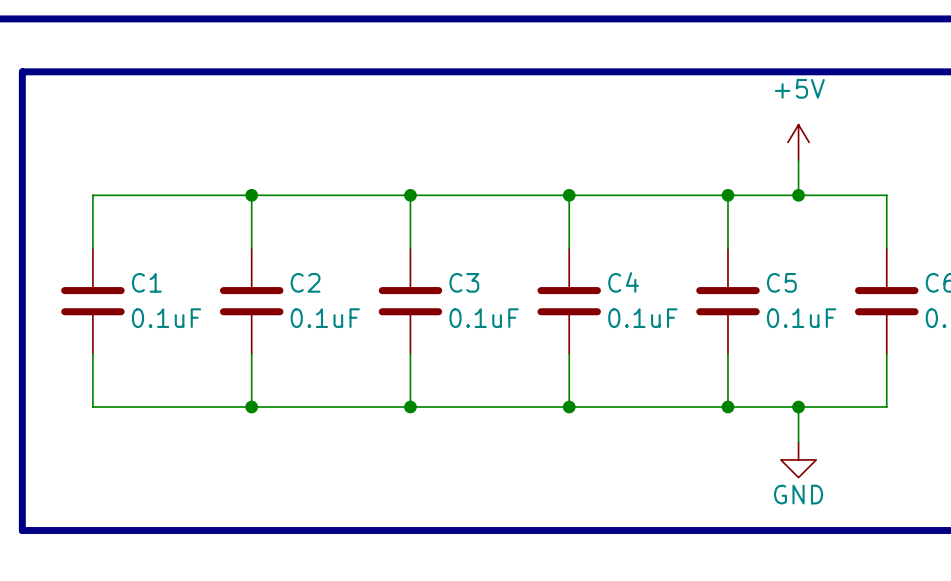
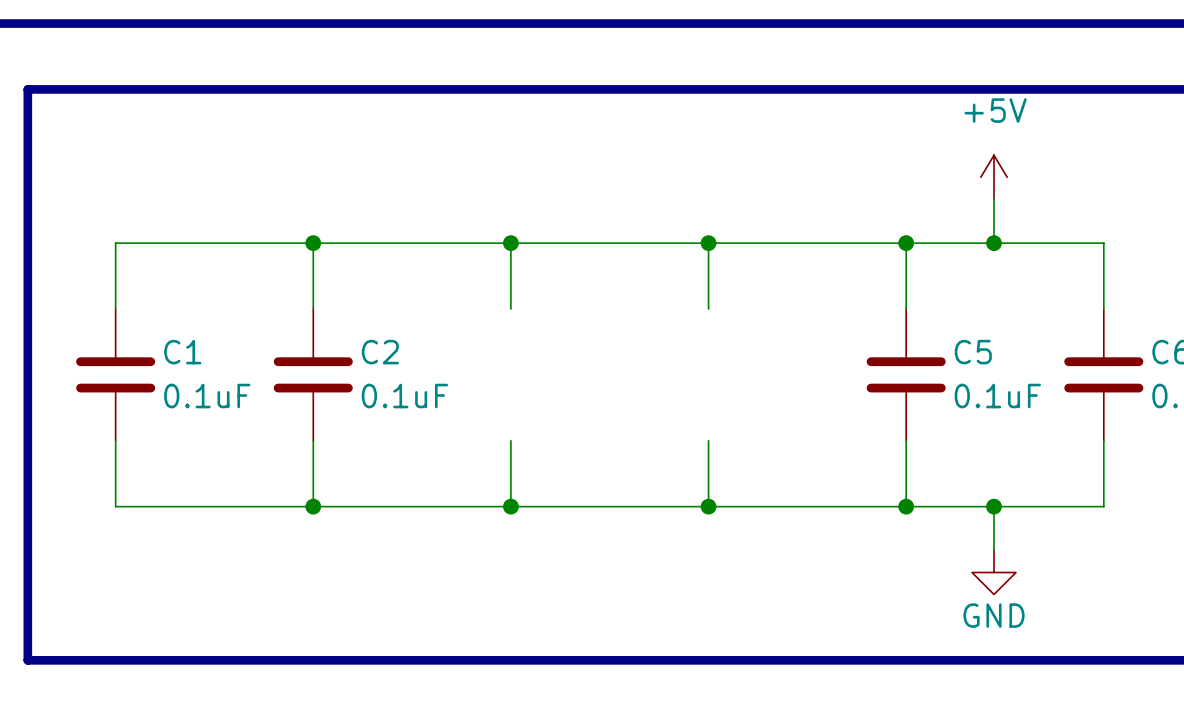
C3: 0.1uF (410, 301) -> none
C4: 0.1uF (569, 301) -> none

